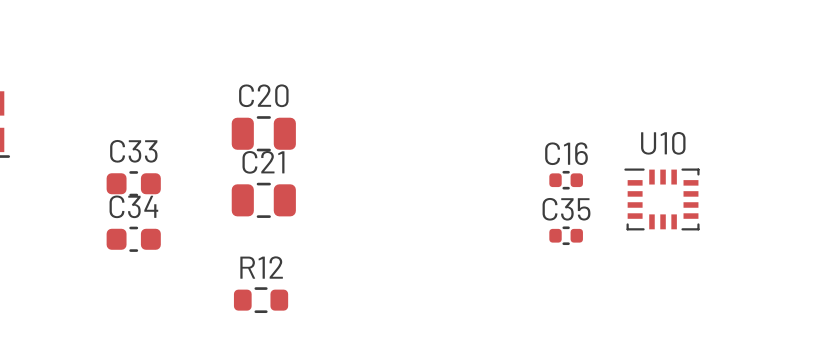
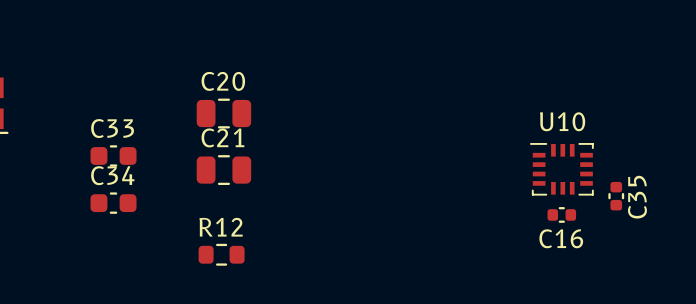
C16 name position: C16 (566, 153) -> C16 (561, 238)
C16 position: (566, 180) -> (561, 214)
C35 rotation: 0° (566, 235) -> 90° clockwise (616, 196)
C35 position: (566, 235) -> (616, 196)

